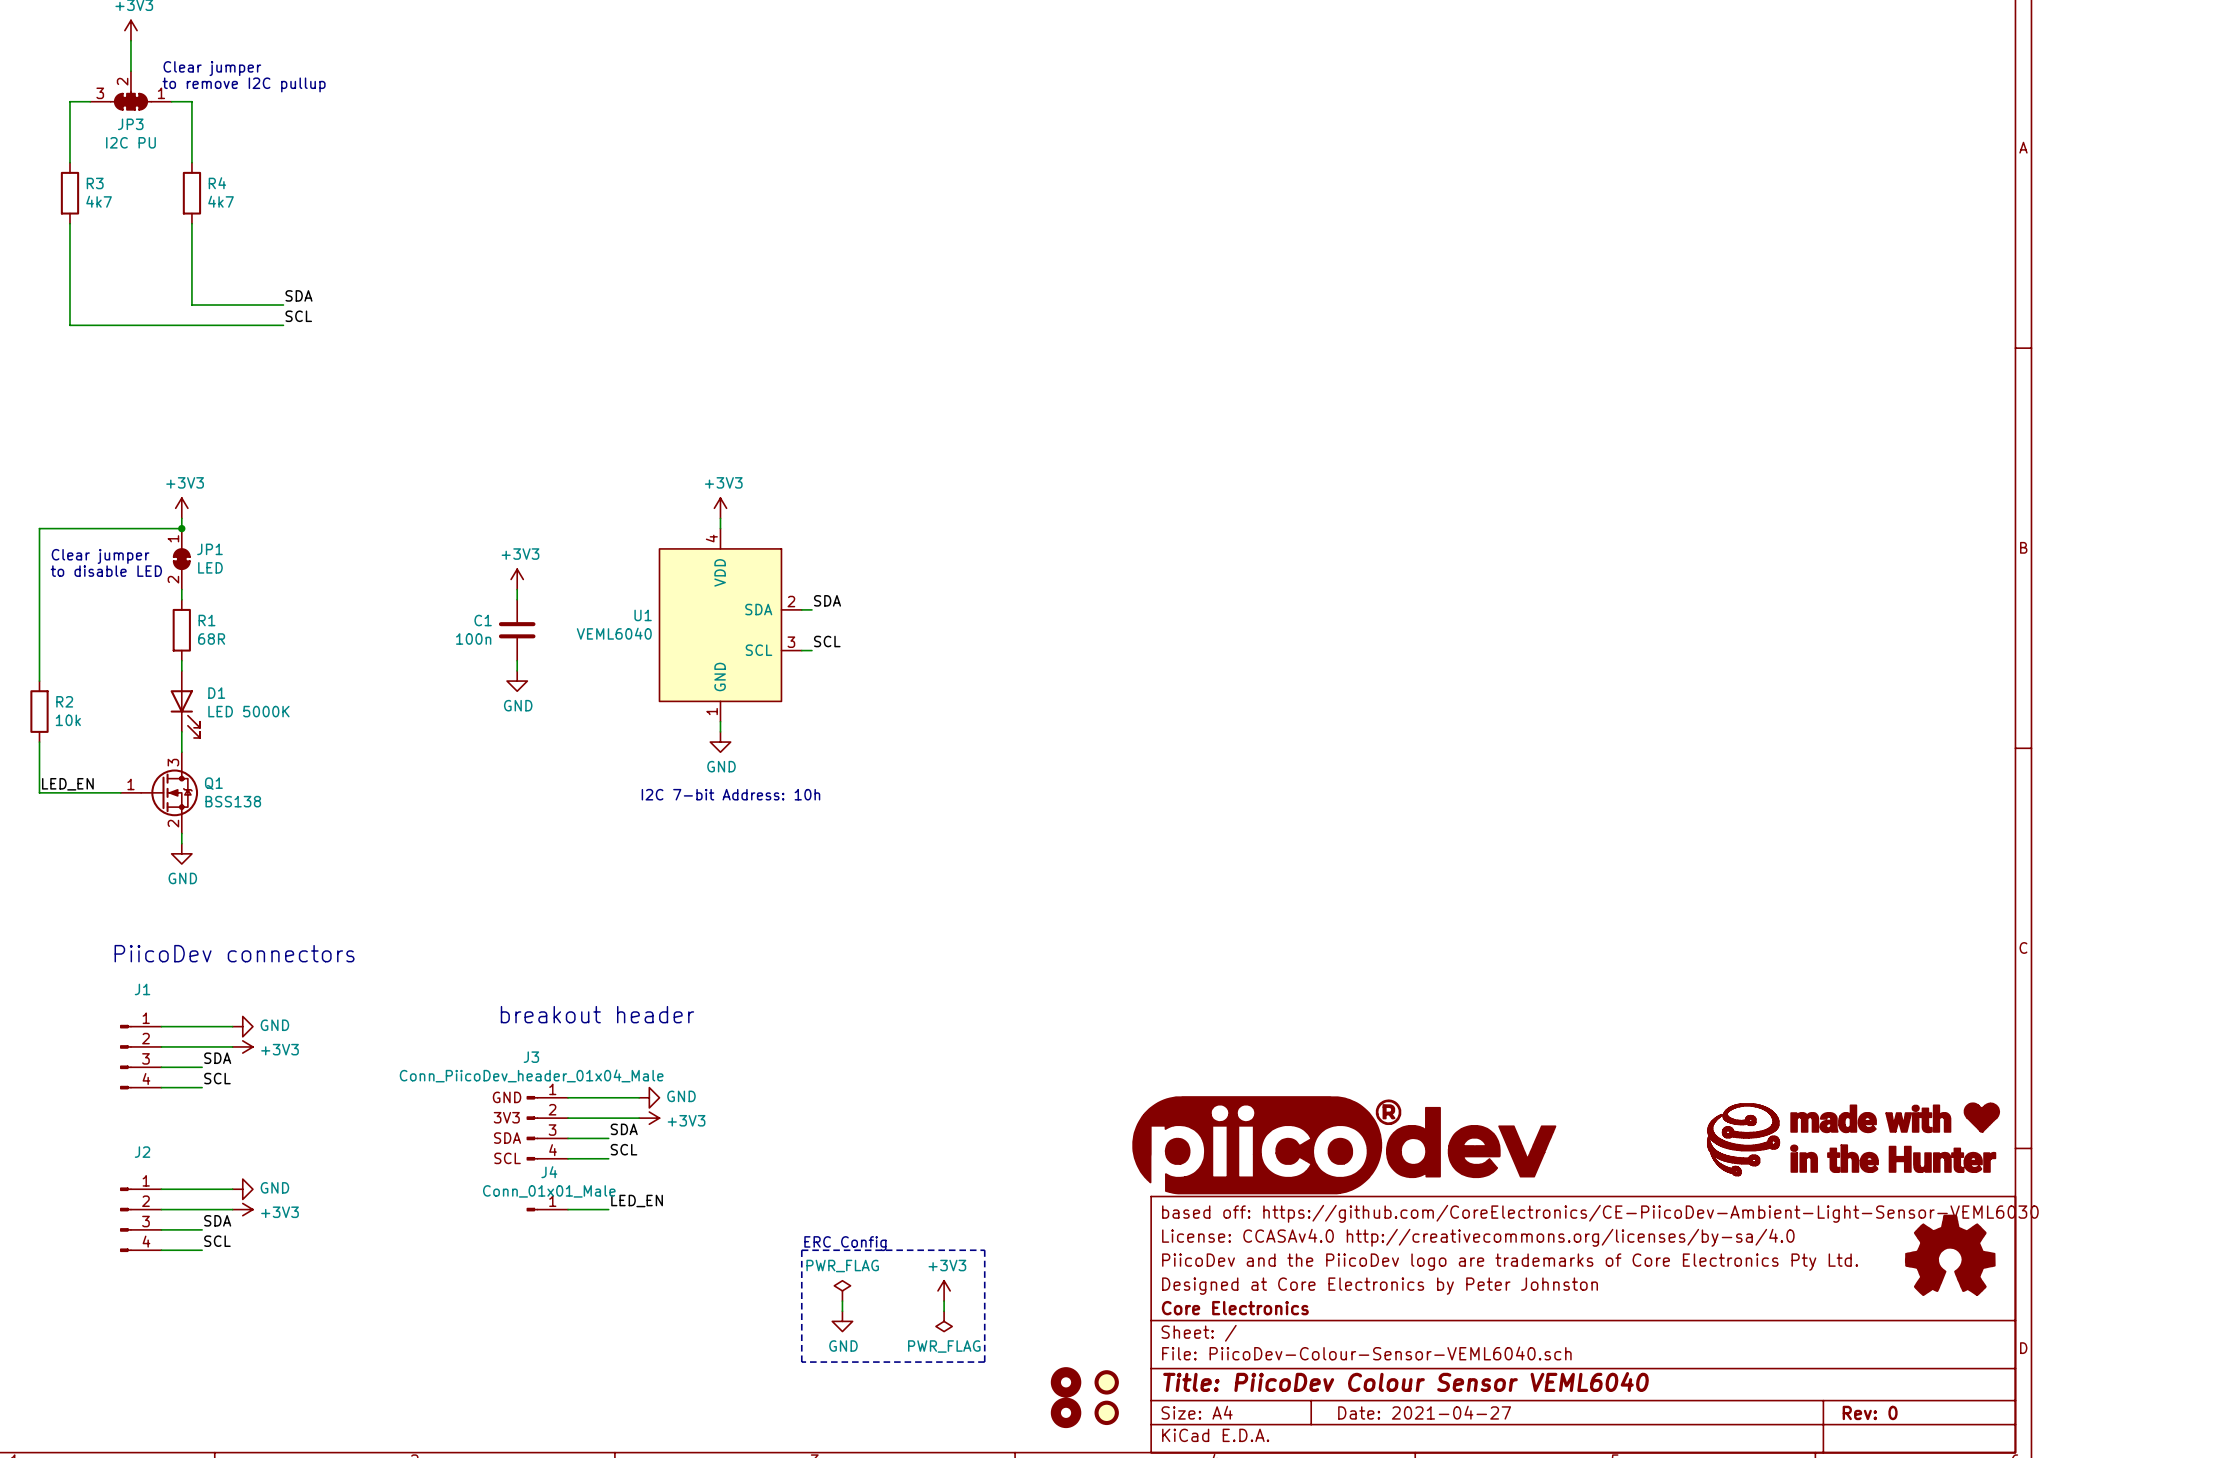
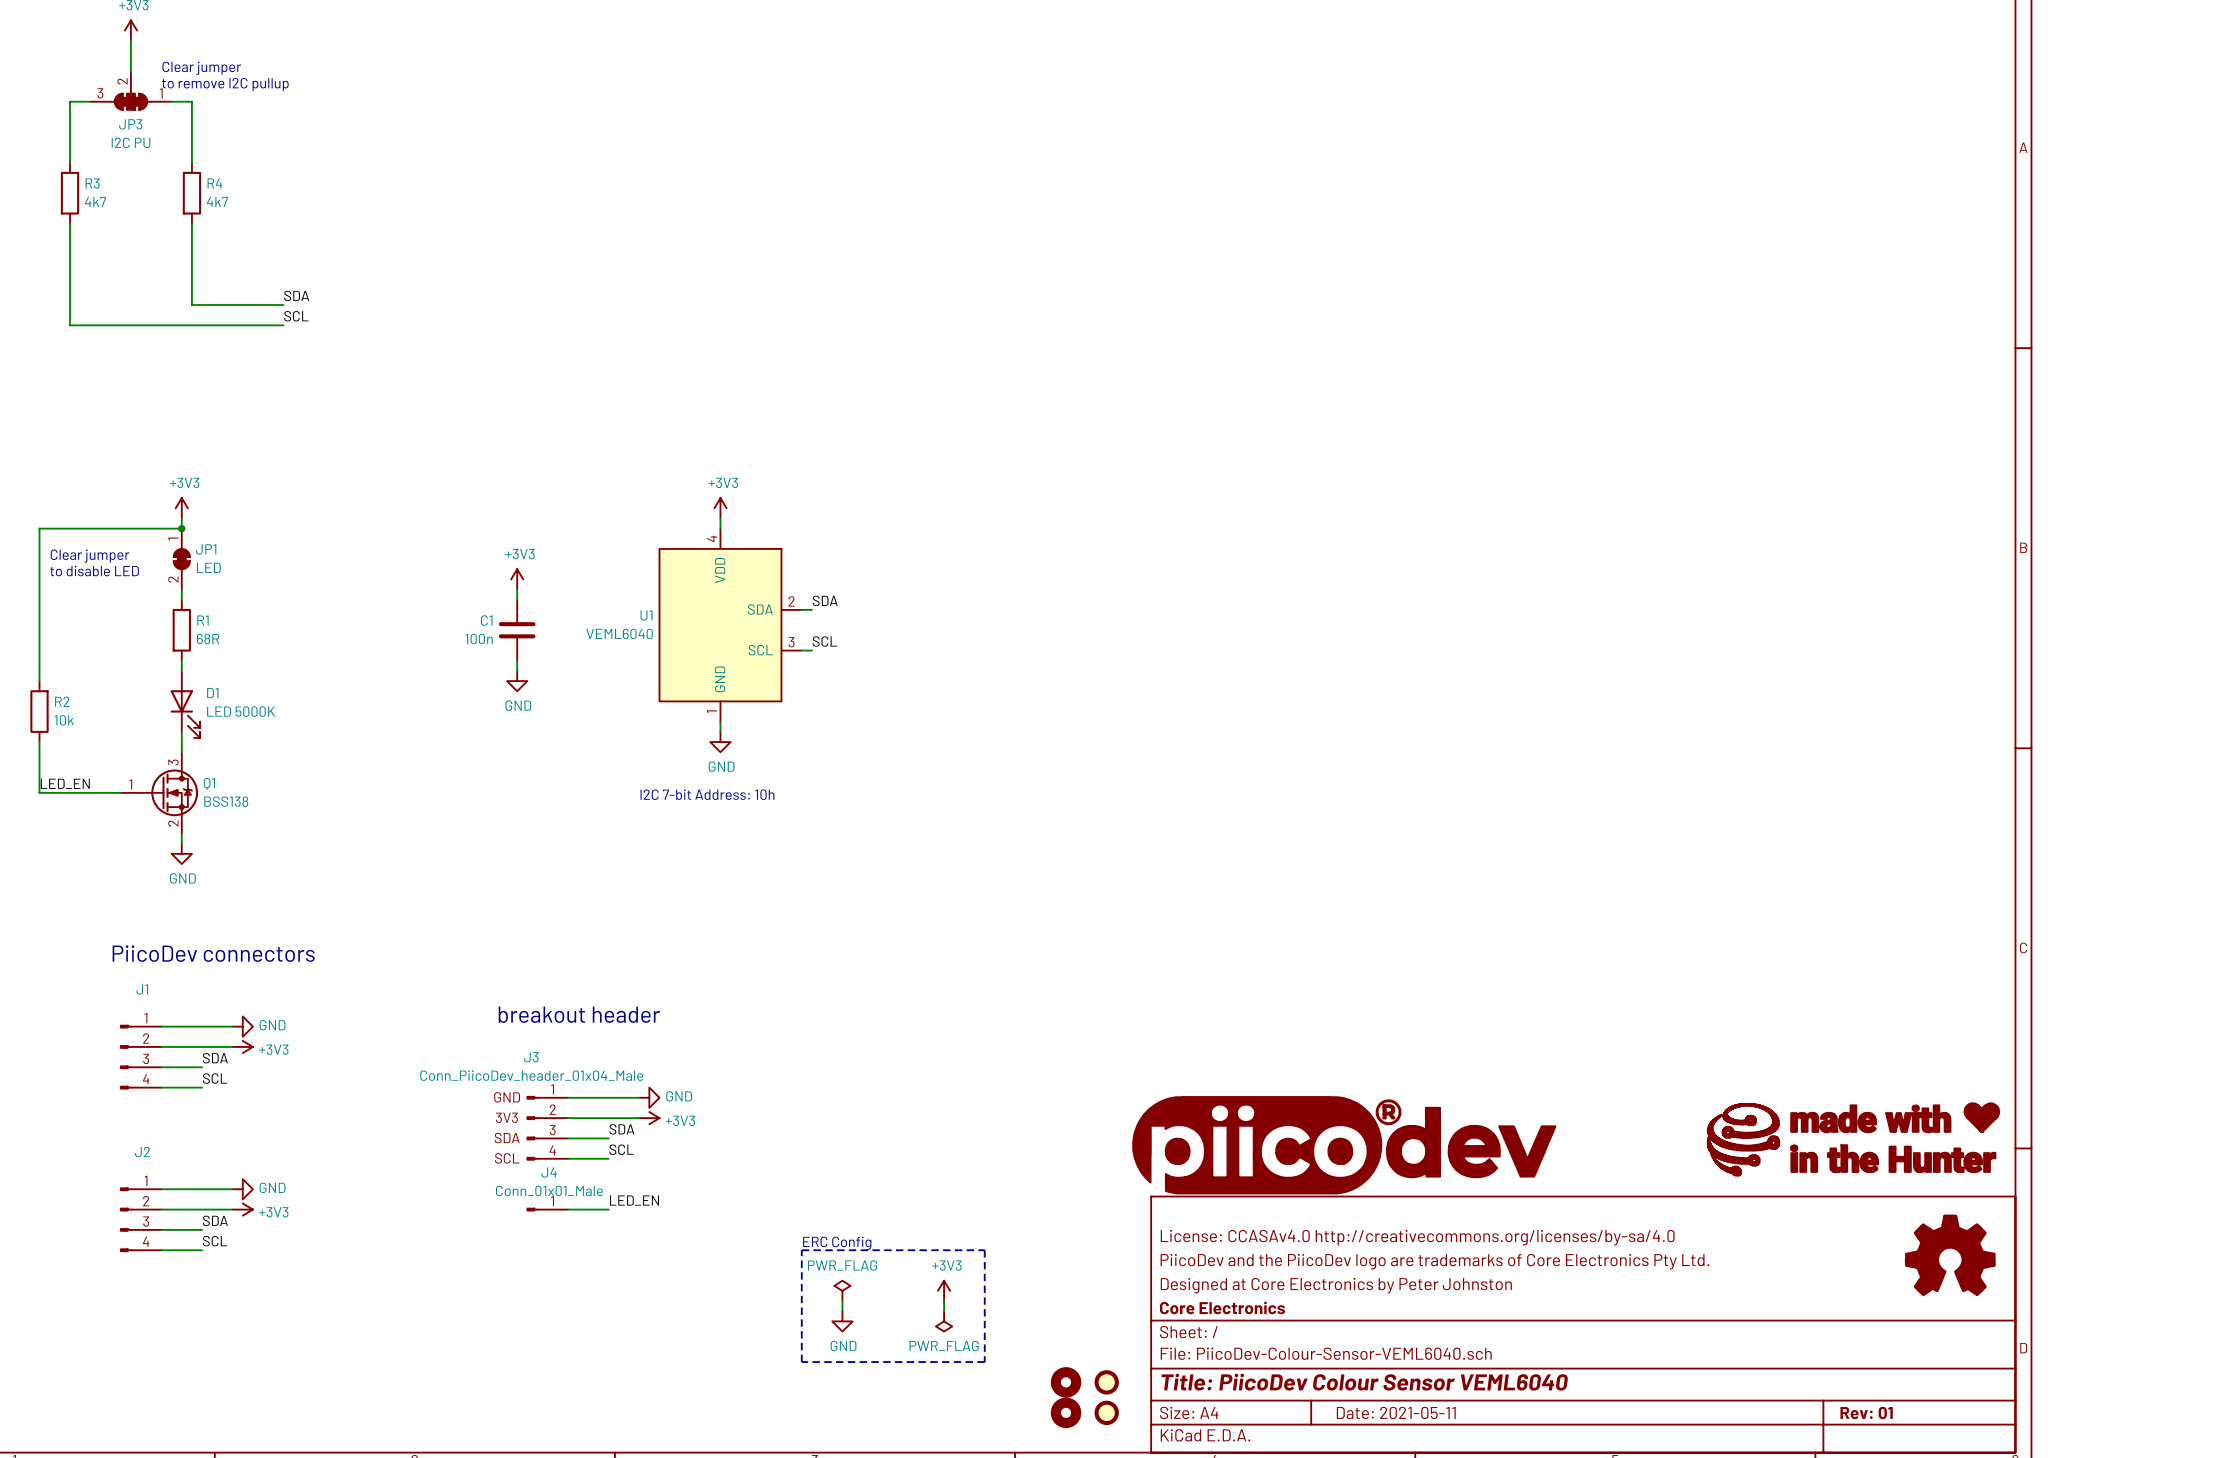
title block: based off: https://github.com/CoreElectronics/CE-PiicoDev-Ambient-Light-Sensor-VEML6030 (1600, 1213) -> none
title block: Date: 2021-04-27 (1424, 1412) -> Date: 2021-05-11 (1396, 1412)
title block: Rev: 0 (1870, 1412) -> Rev: 01 (1866, 1412)

